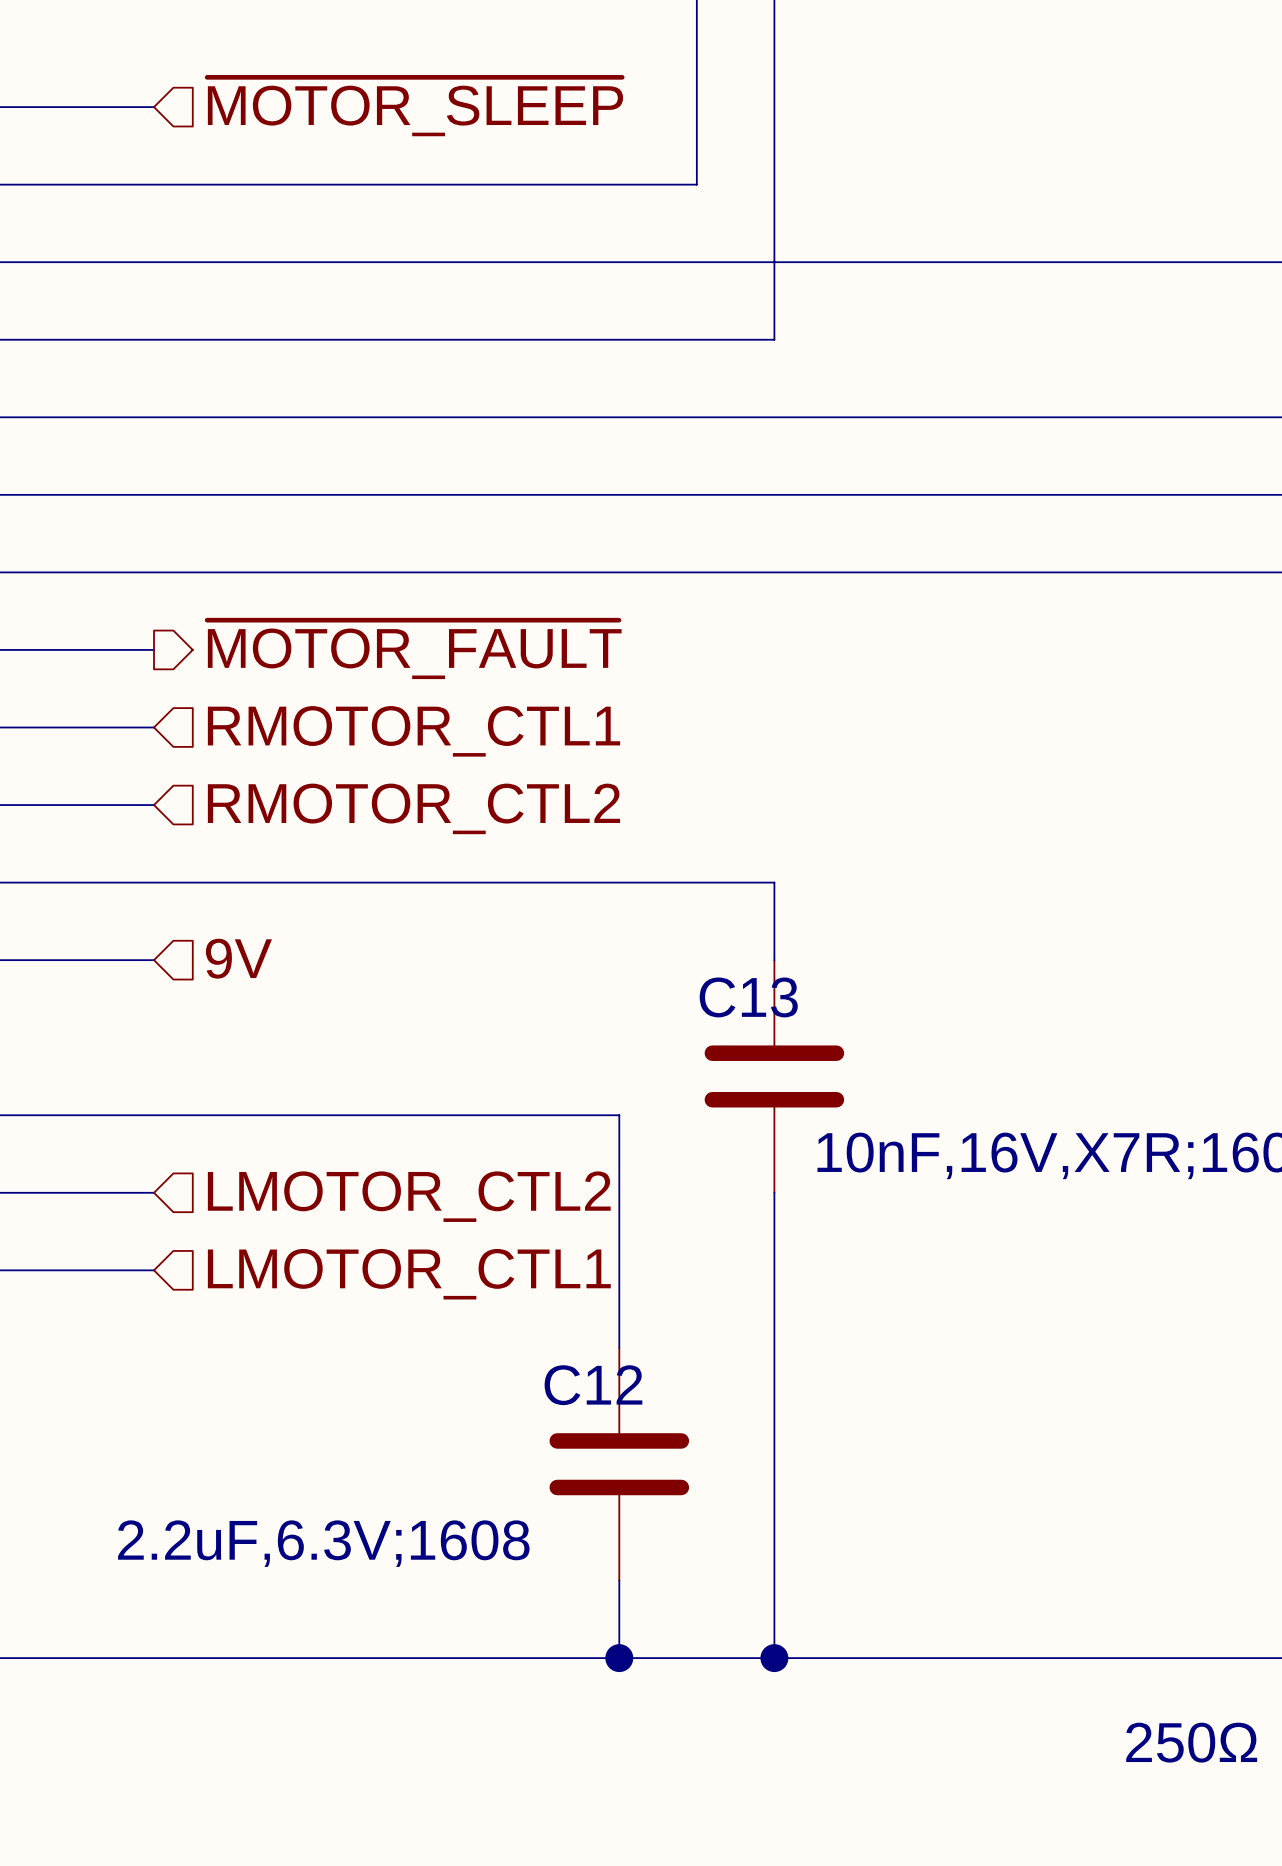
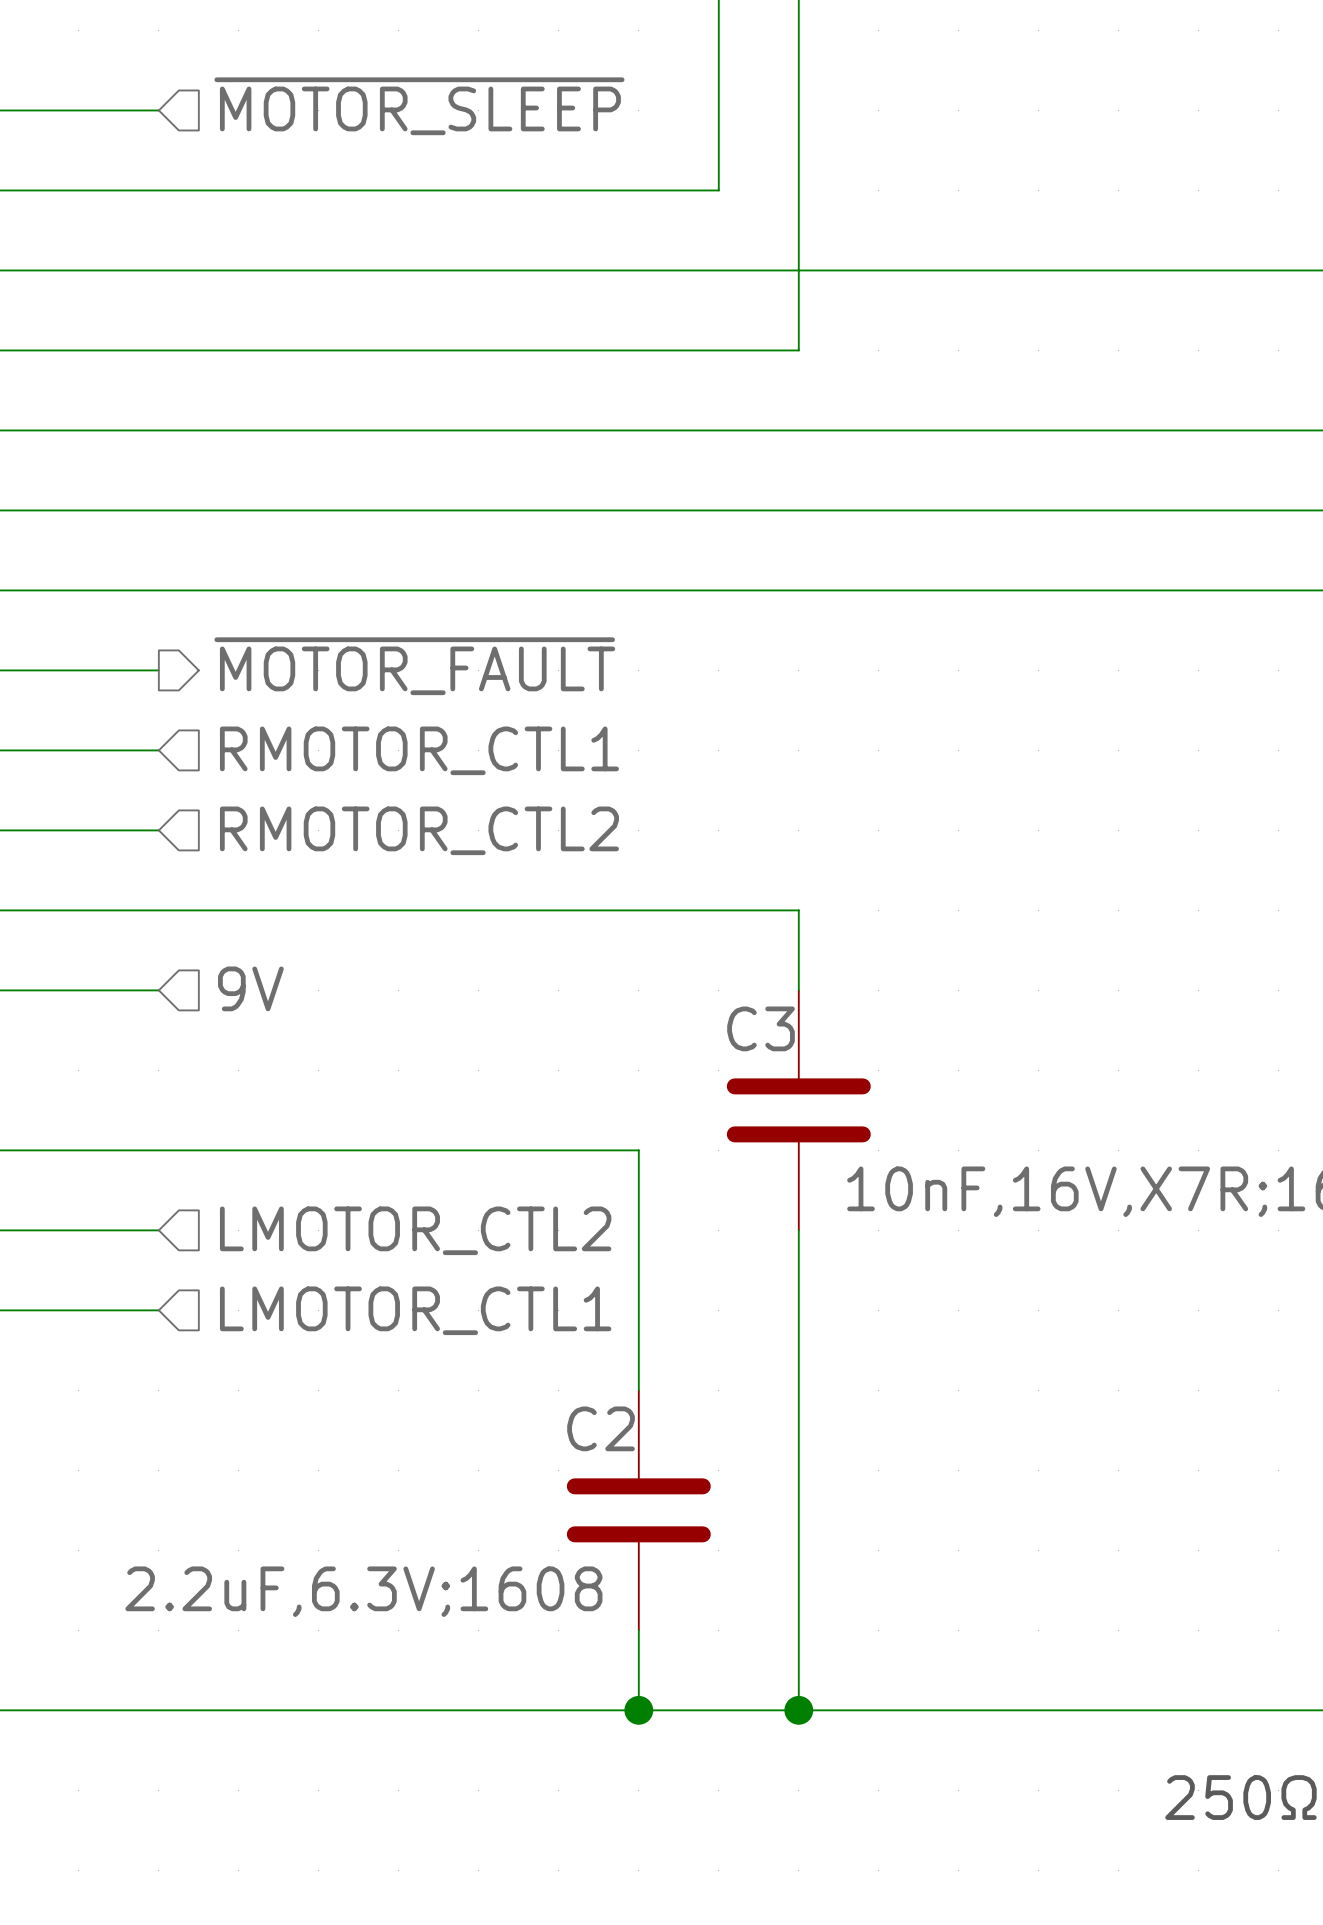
C13 name: C13 (748, 997) -> C3 (761, 1028)
C12 name: C12 (593, 1385) -> C2 (601, 1428)

